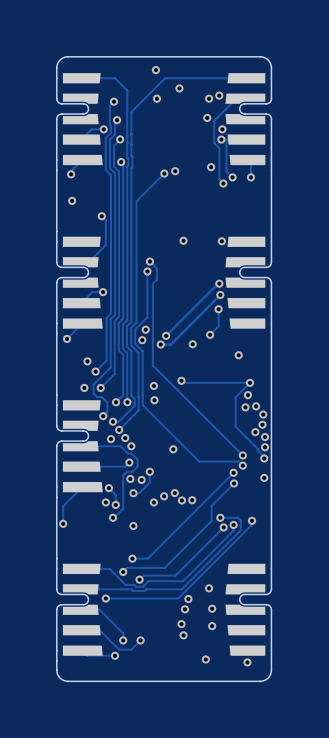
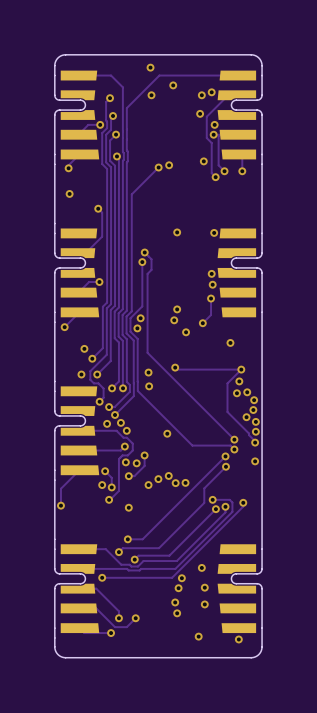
track: (219, 283) (166, 335) -> none
track: (220, 294) (170, 344) (160, 344) -> none
via: none -> (177, 309)
via: none -> (174, 320)
via: (166, 335) -> none
via: (160, 344) -> none

